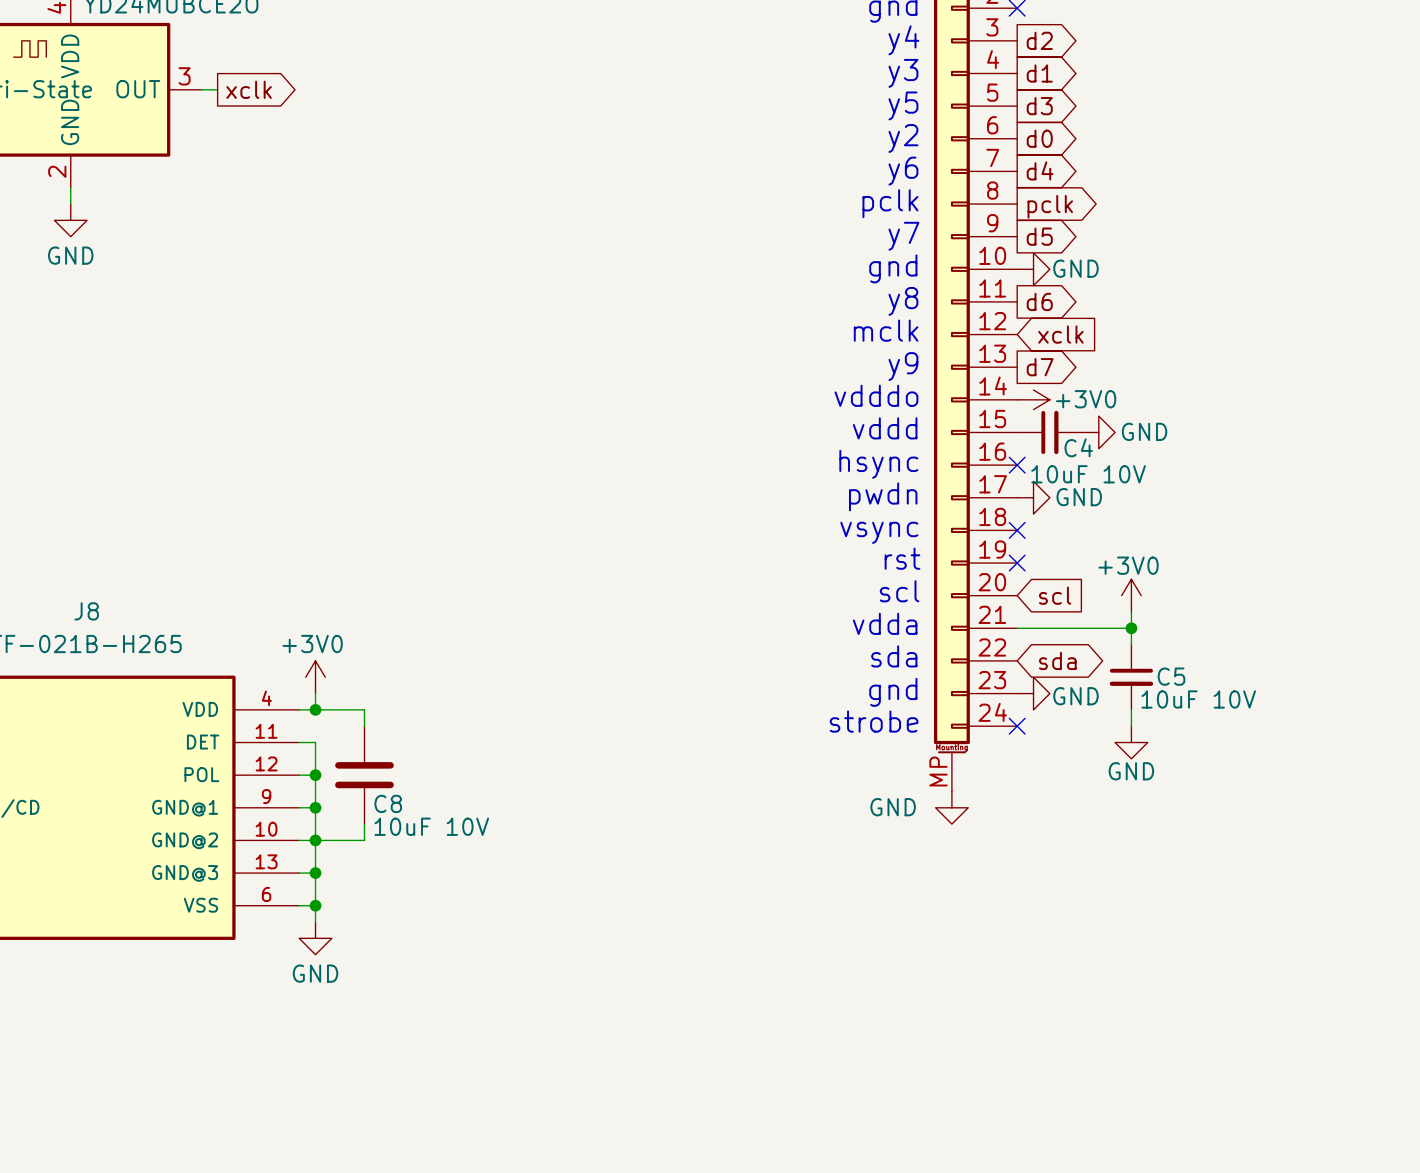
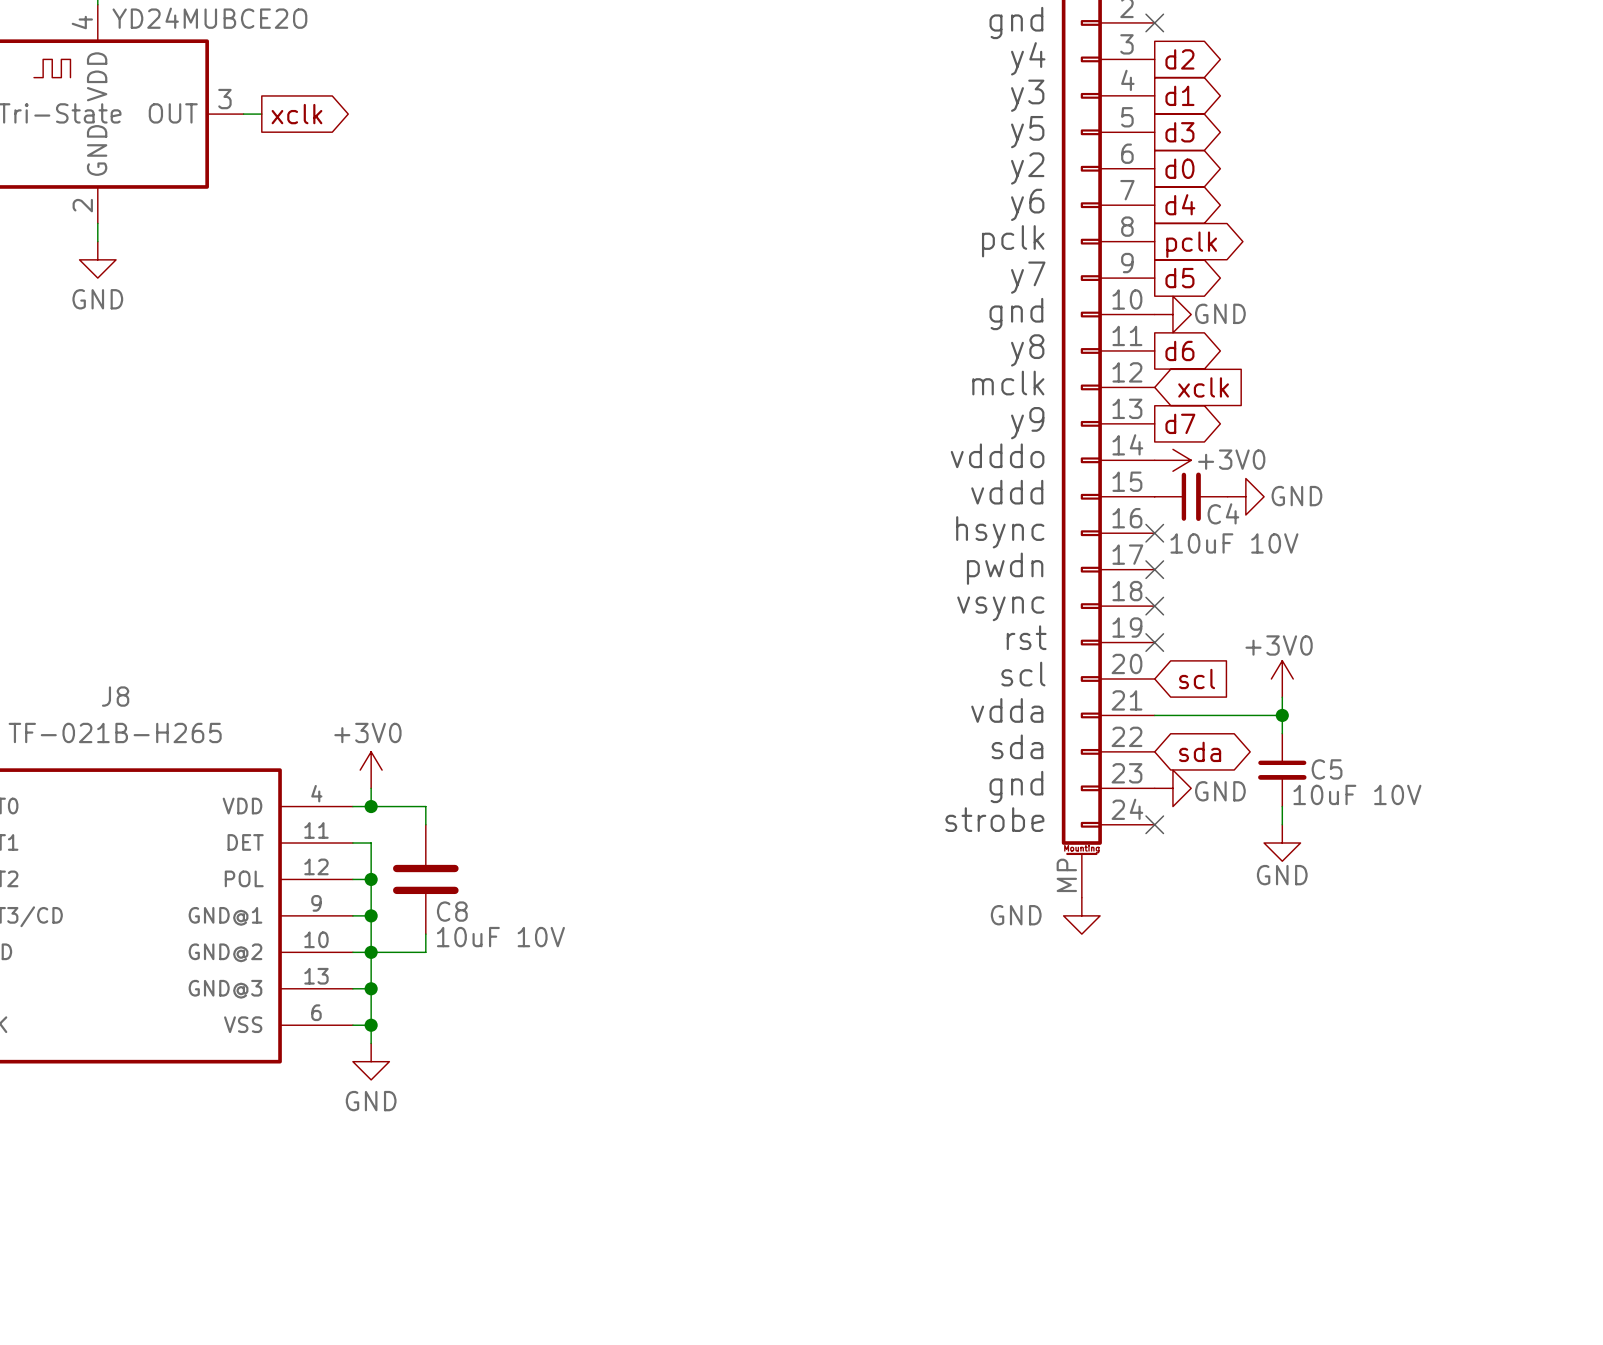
no-connect mark: none -> (1154, 569)
power symbol: GND (1033, 497) -> none

